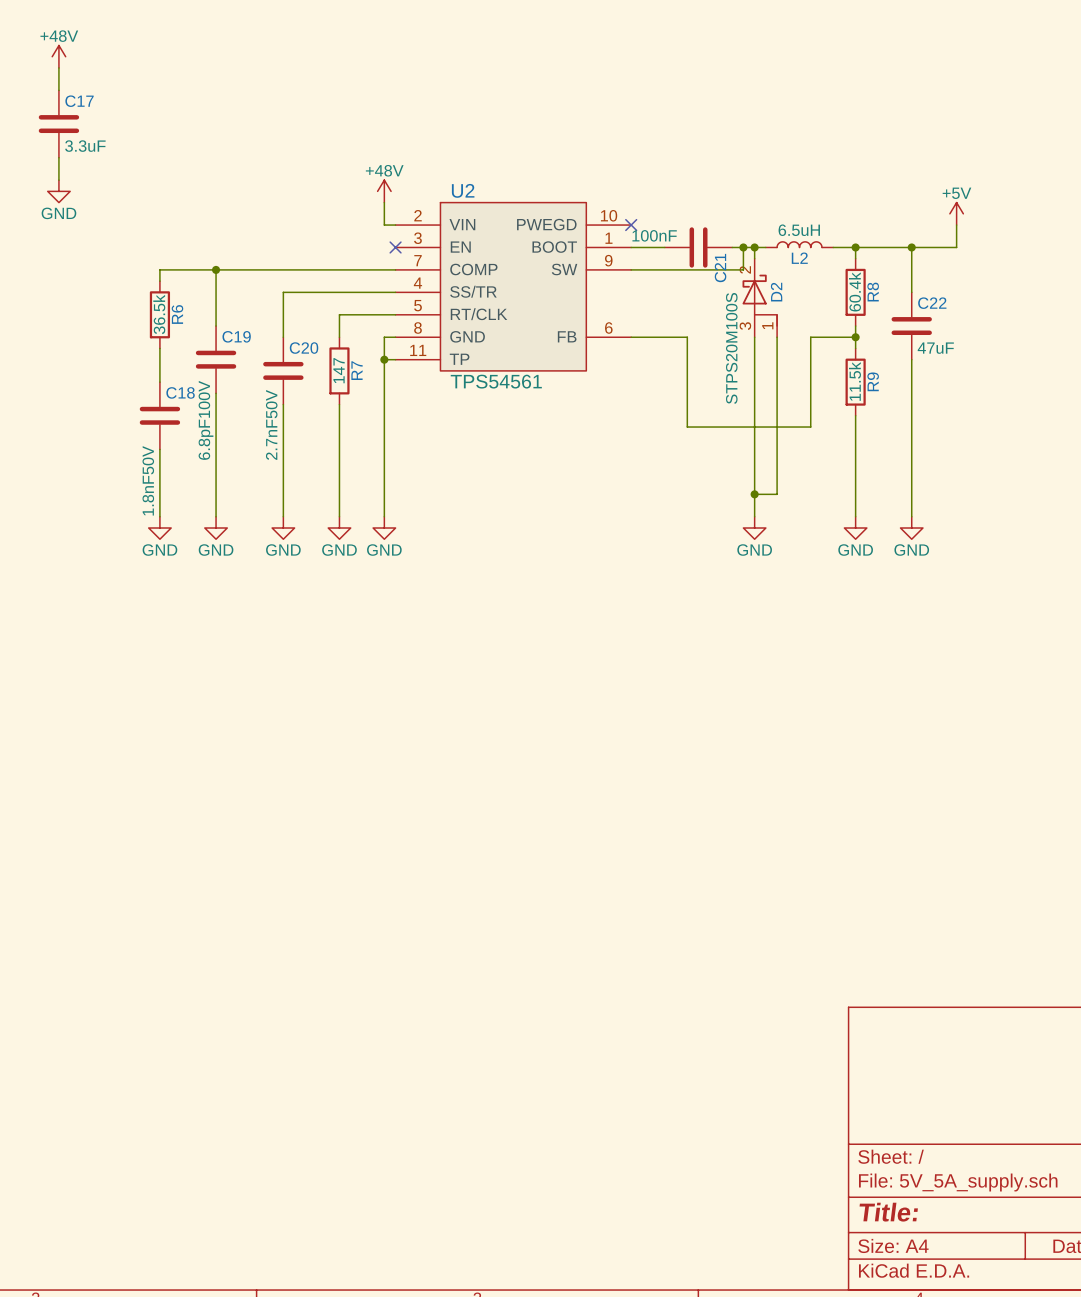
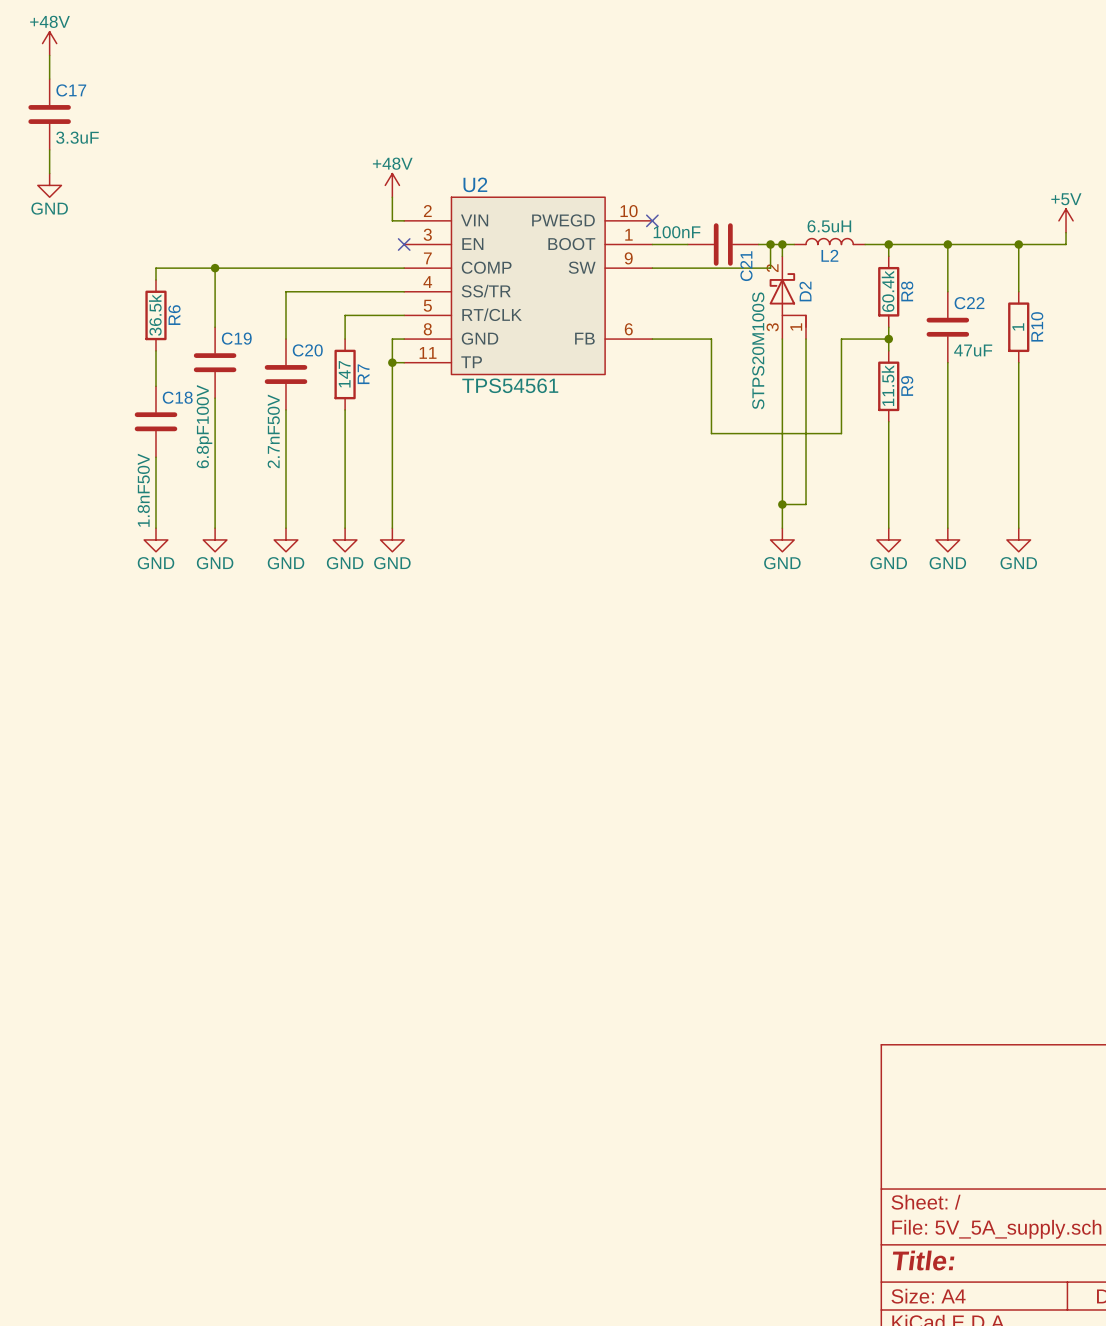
power symbol position: +5V (956, 213) -> +5V (1066, 220)
wire: (956, 225) (956, 247) -> (1066, 232) (1066, 244) (995, 244)
wire: none -> (1018, 244) (1018, 291)
junction: none -> (1018, 244)
R10: none -> 1 (1018, 327)
wire: none -> (1018, 362) (1018, 528)
power symbol: none -> GND (1018, 539)

